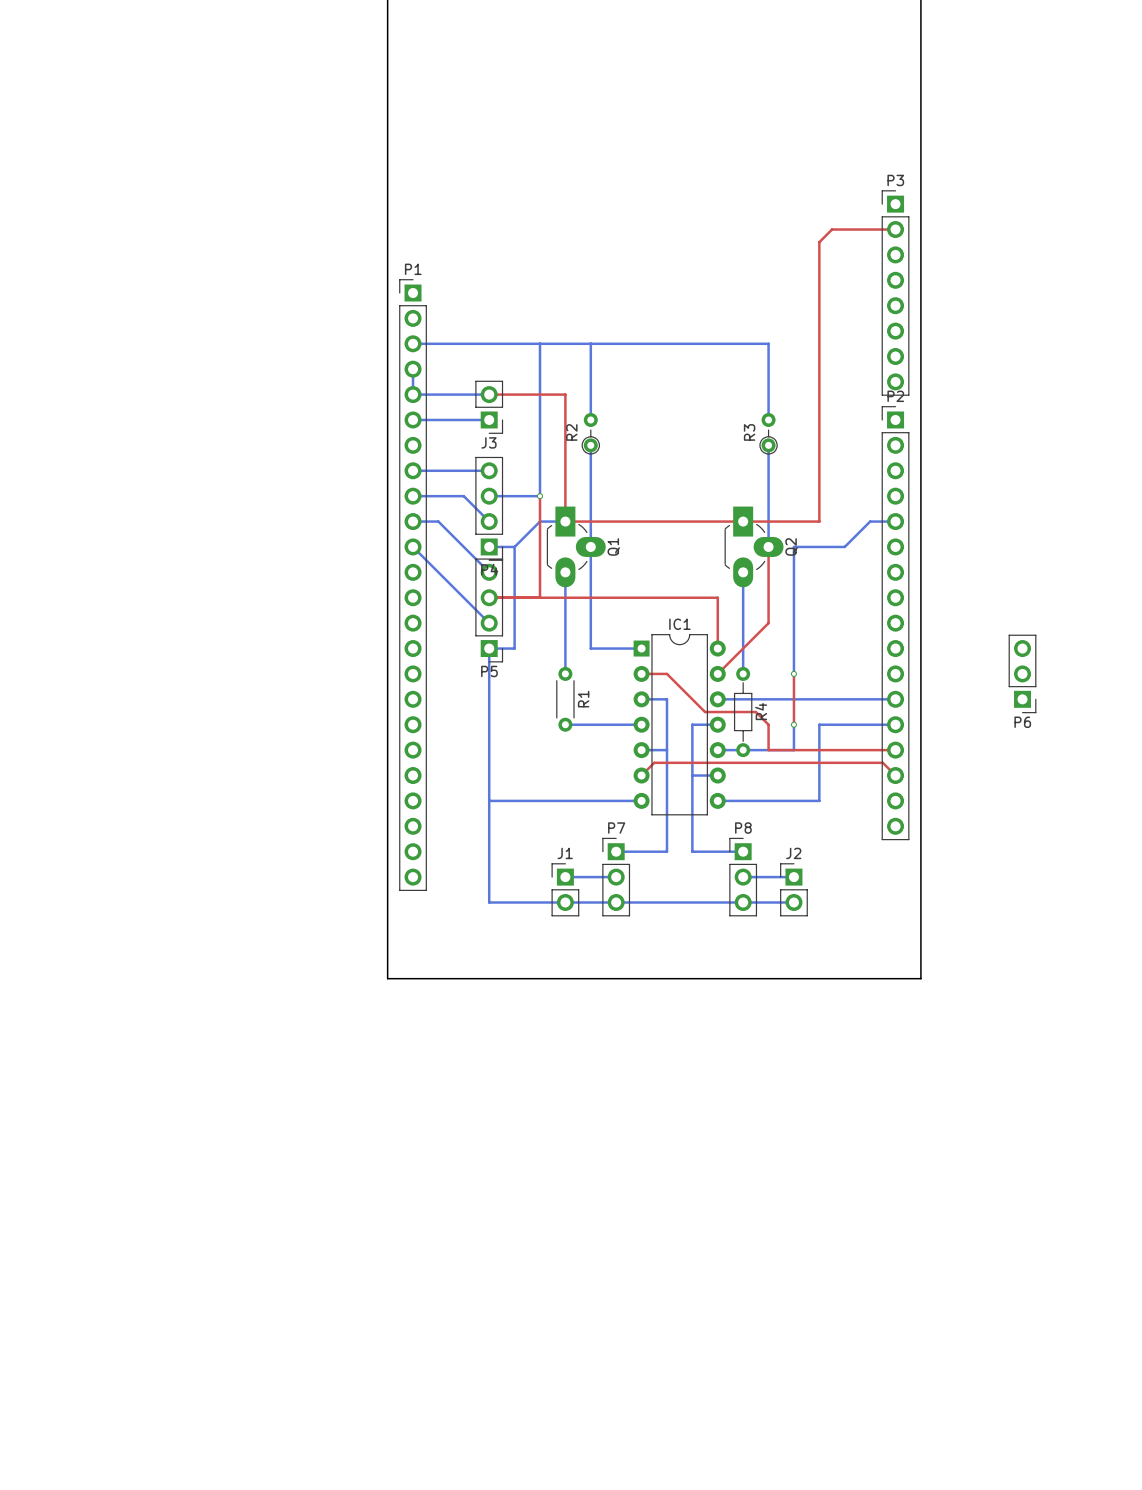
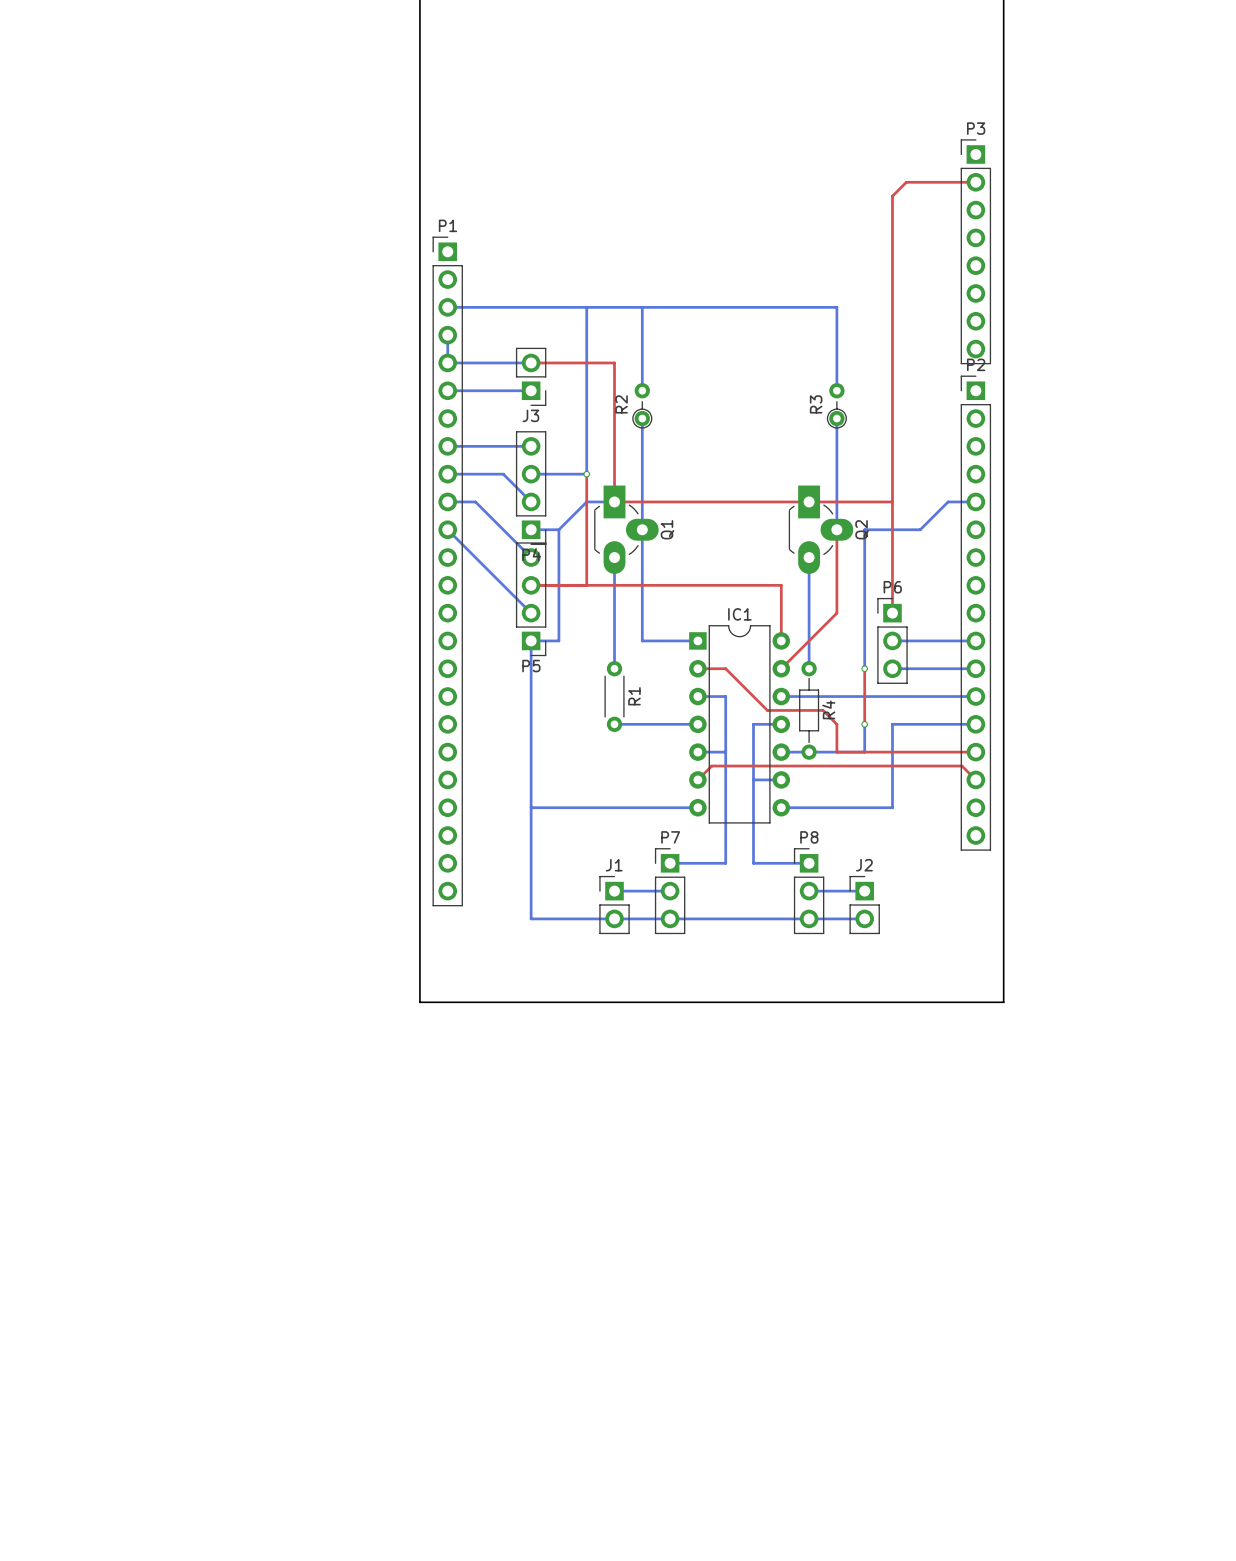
top track: none -> (892, 501) (892, 613)
bottom track: none -> (892, 640) (975, 640)
bottom track: none -> (892, 668) (975, 668)
P6 rotation: 0° (1022, 673) -> 180° (892, 640)
P6 position: (1022, 673) -> (892, 640)

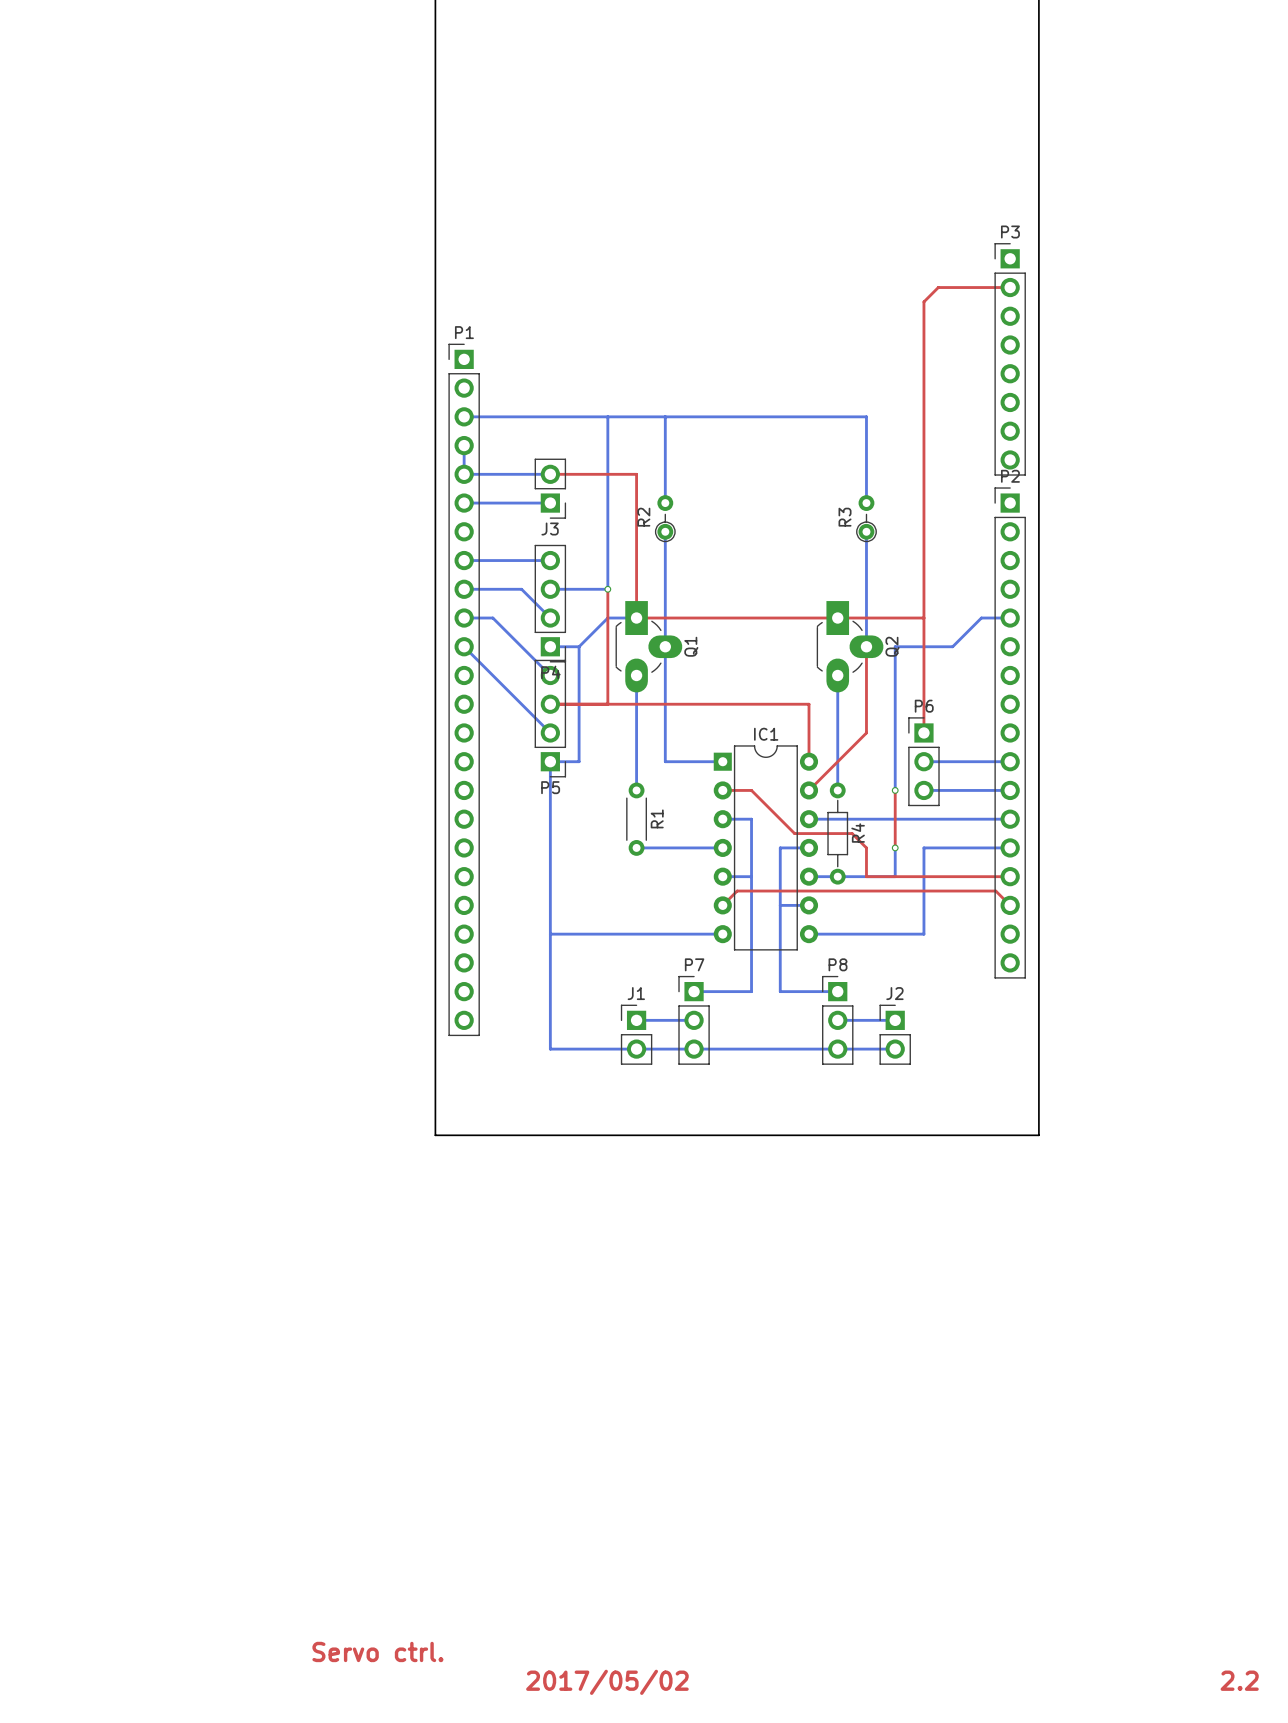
text: none -> Servo ctrl. (377, 1651)
text: none -> 2.2 (1239, 1680)
text: none -> 2017/05/02 (607, 1682)

